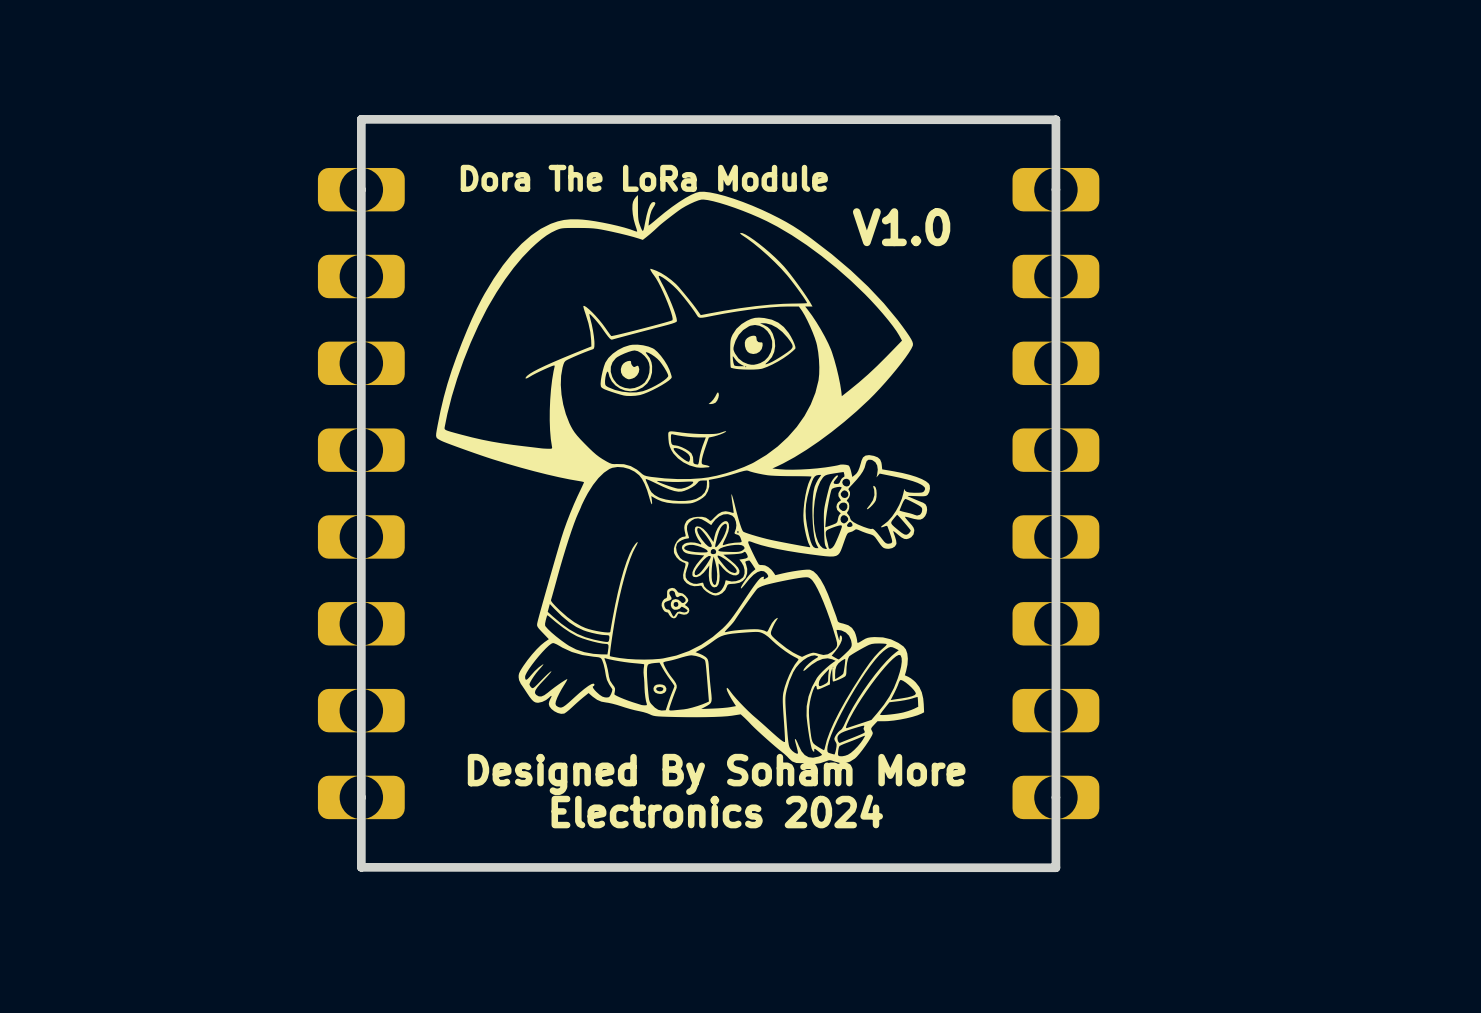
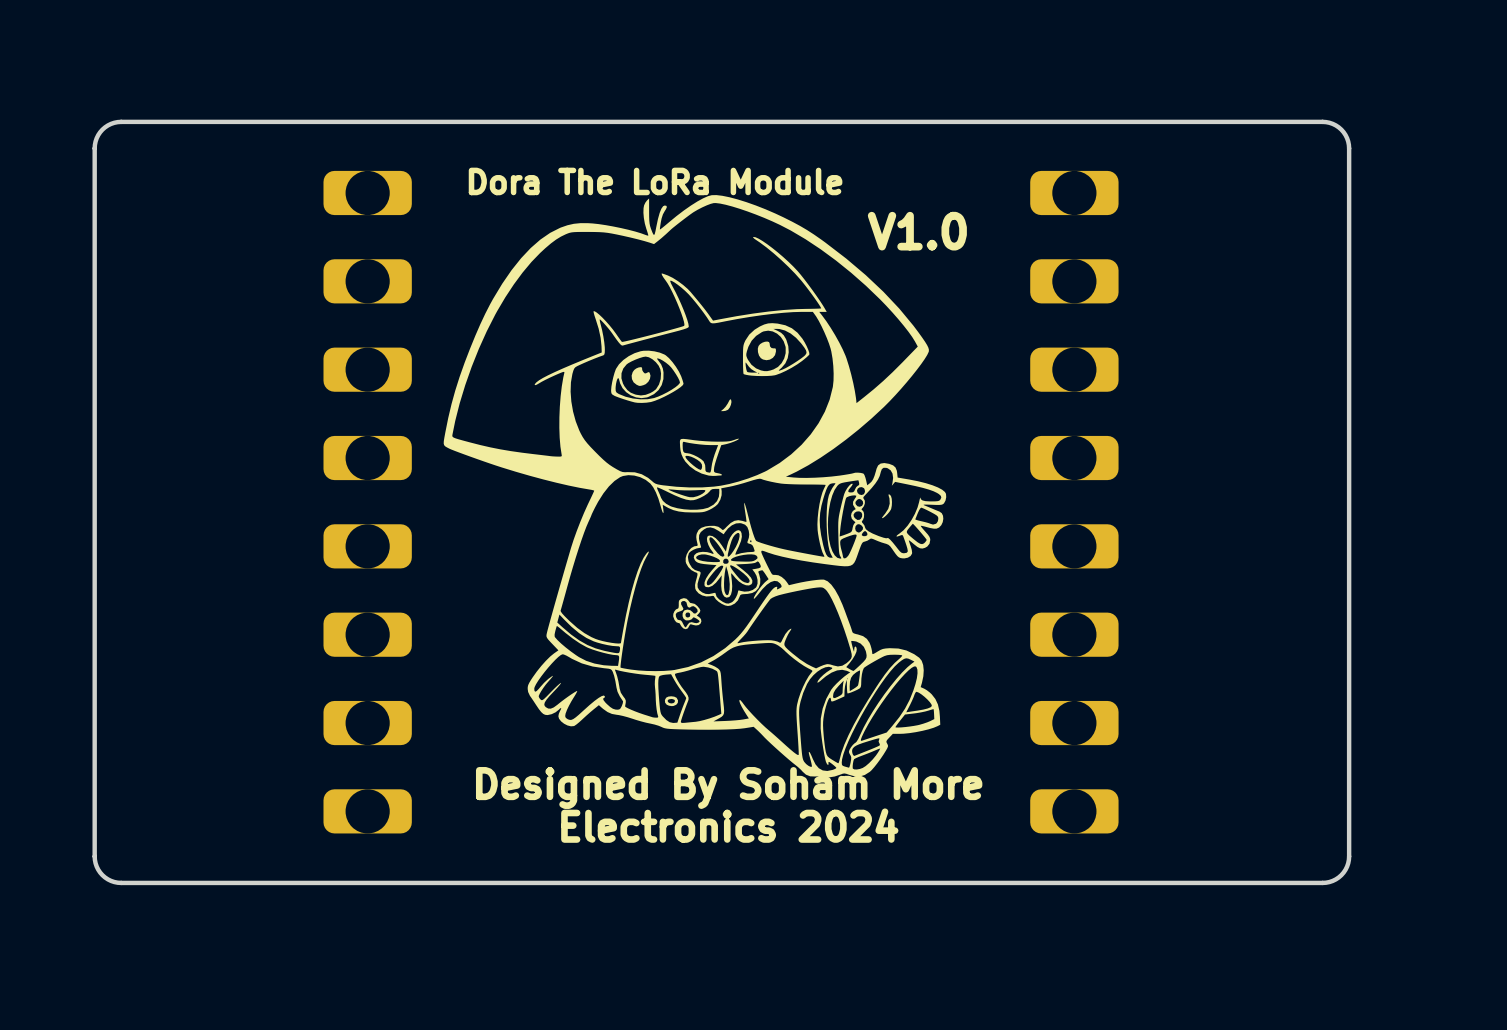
board edge: (361, 119) (361, 867) (1055, 867) (1055, 119) (361, 119) -> (1322, 121) (1332, 123) (1341, 129) (1347, 138) (1349, 148) (1349, 856) (1345, 869) (1335, 879) (1322, 882) (121, 882) (107, 879) (98, 869) (94, 856) (94, 148) (98, 135) (107, 125) (121, 121) (1322, 121)

